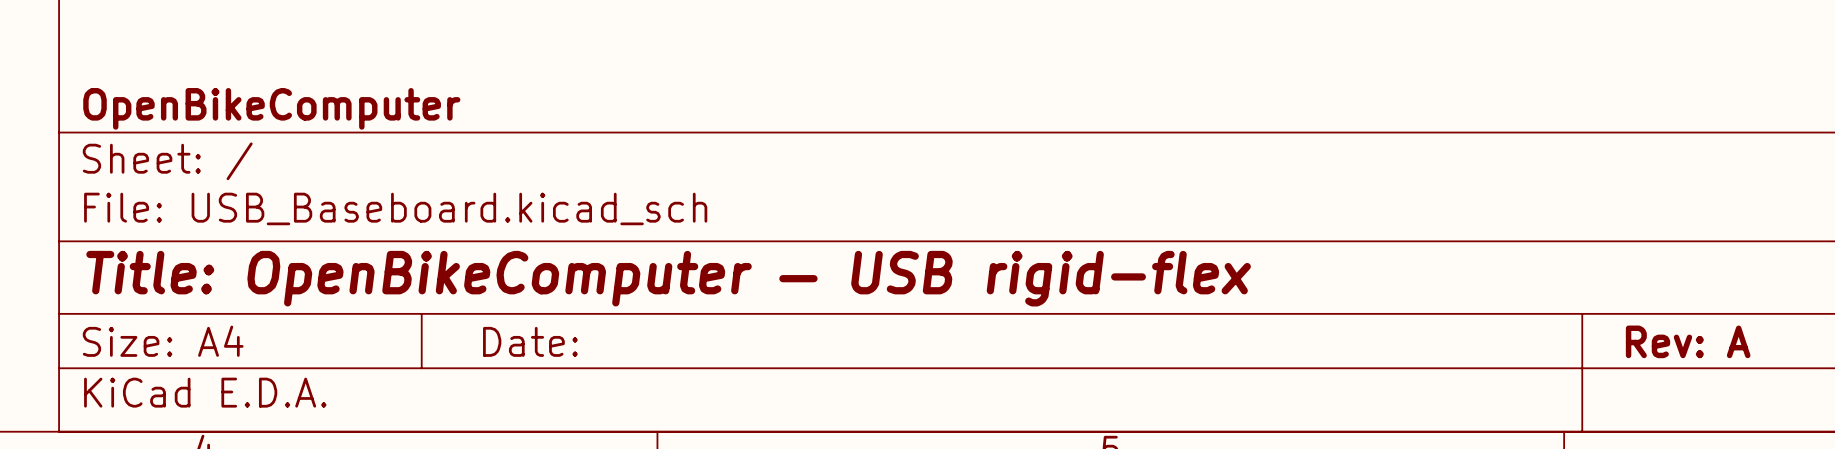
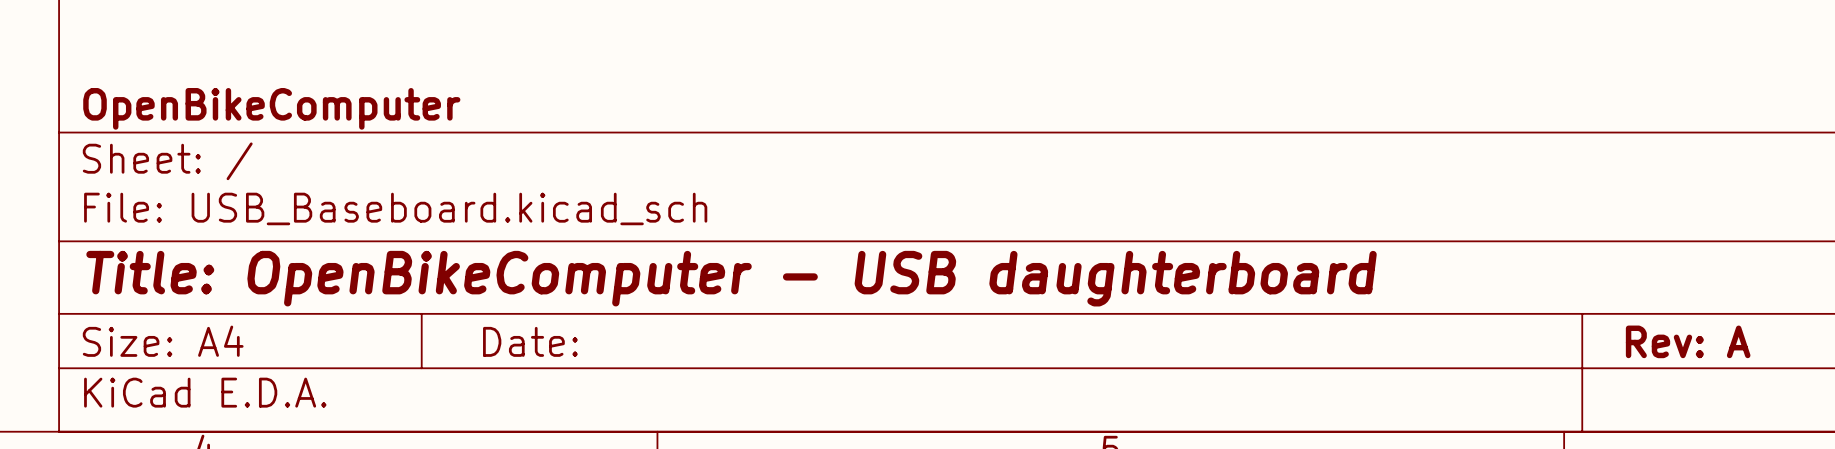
title block: Title: OpenBikeComputer — USB rigid-flex (668, 278) -> Title: OpenBikeComputer - USB daughterboard (731, 278)

